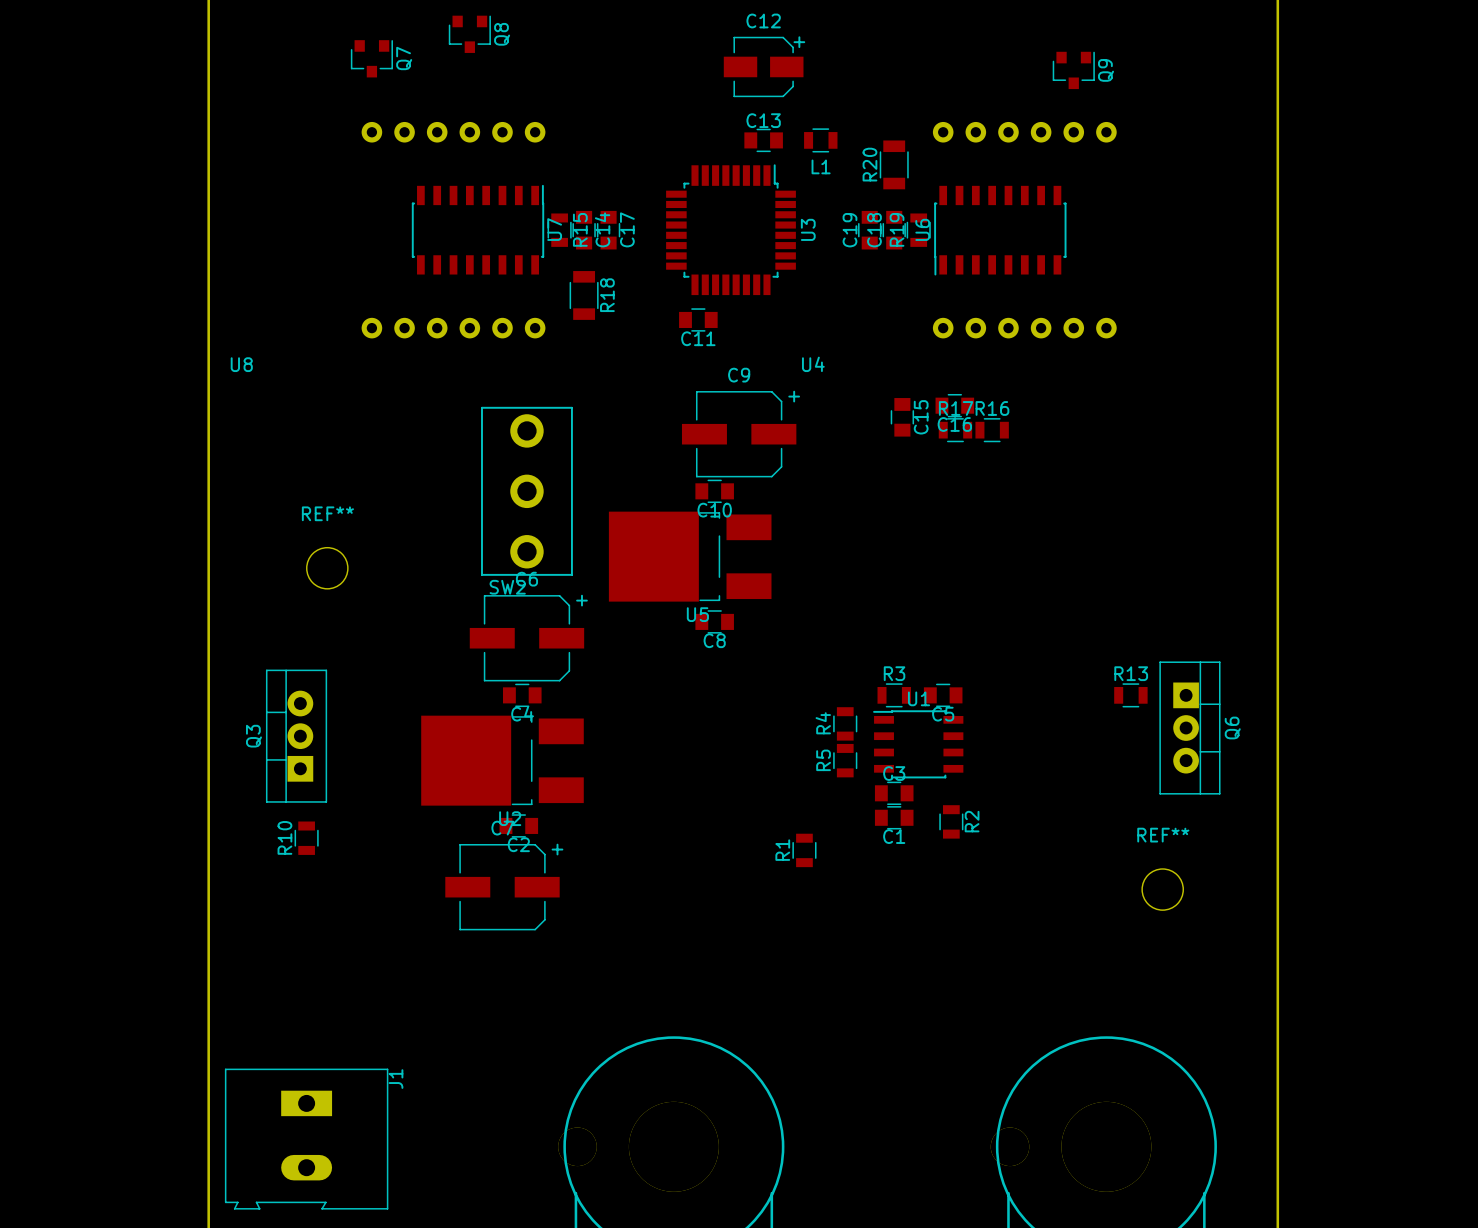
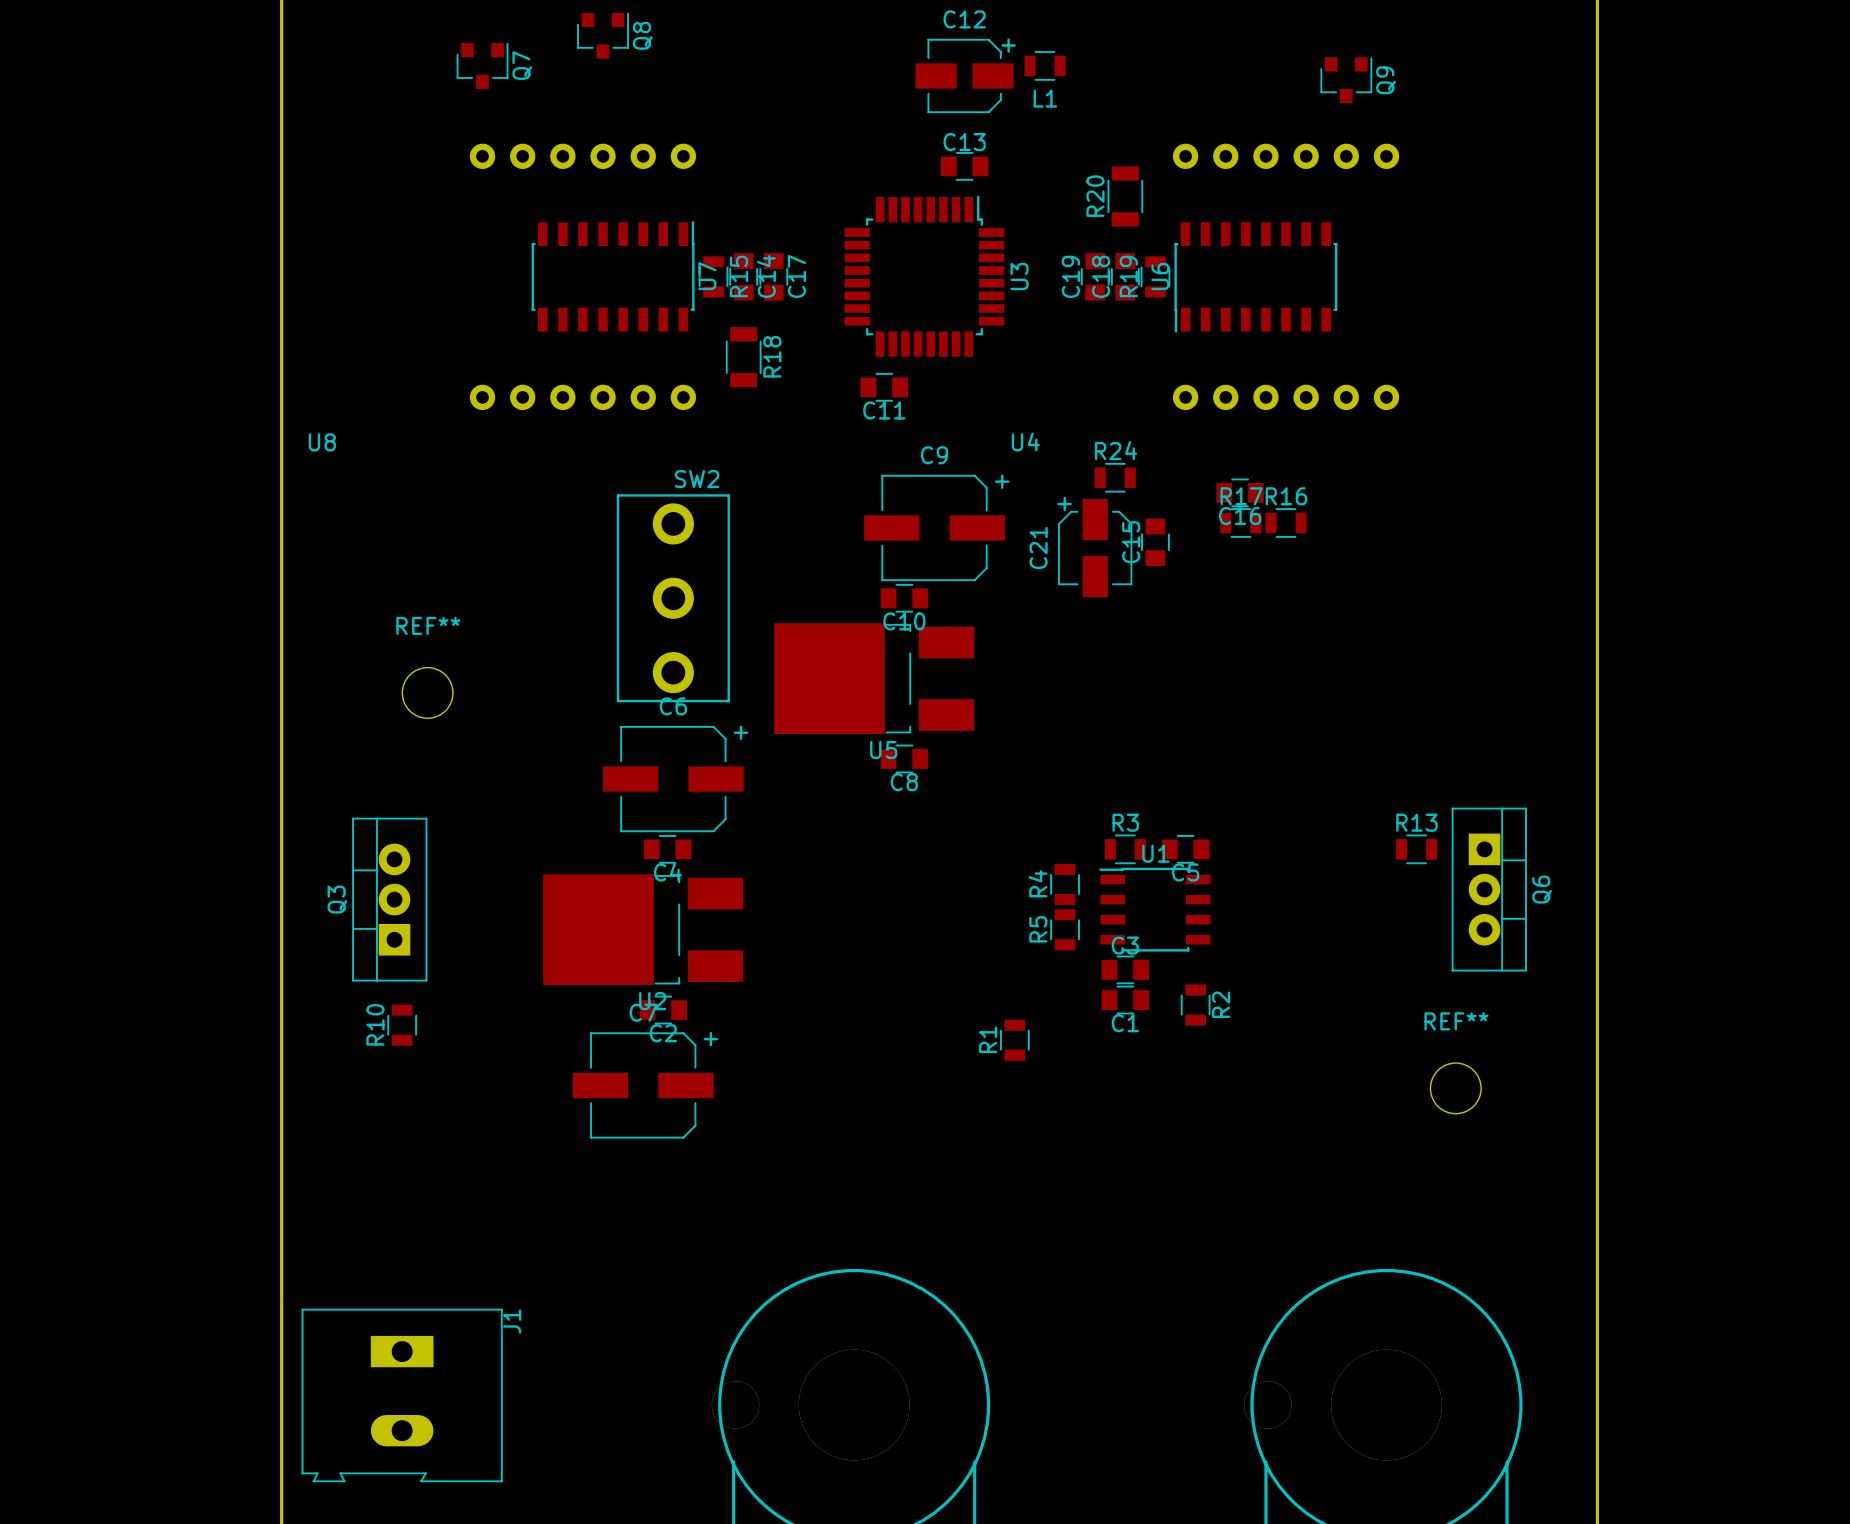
L1 position: (820, 140) -> (1044, 65)
R24: none -> (1115, 477)
C16 position: (954, 405) -> (1240, 492)
C15 position: (902, 417) -> (1155, 542)
C15 name position: C15 (921, 417) -> C15 (1131, 542)
R17 position: (955, 430) -> (1240, 522)
R16 position: (992, 430) -> (1286, 522)
C21: none -> (1095, 548)
SW2 name position: SW2 (507, 587) -> SW2 (697, 479)

